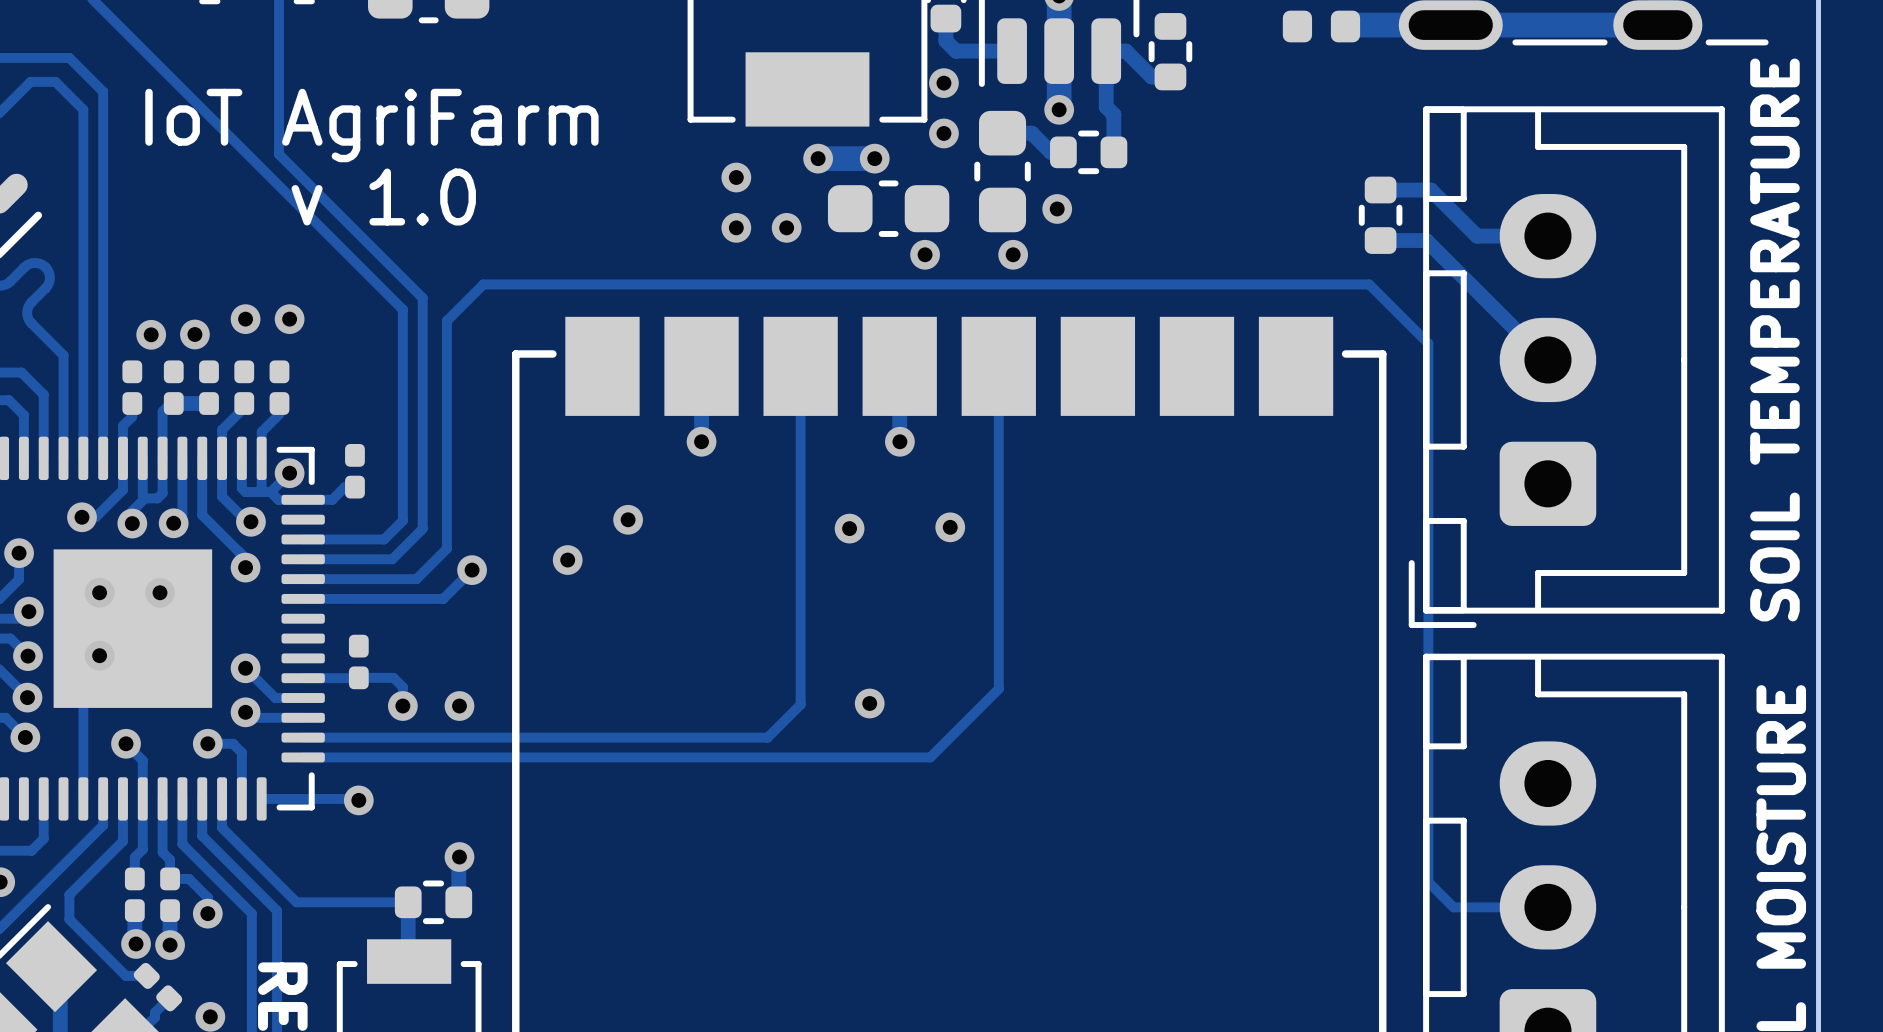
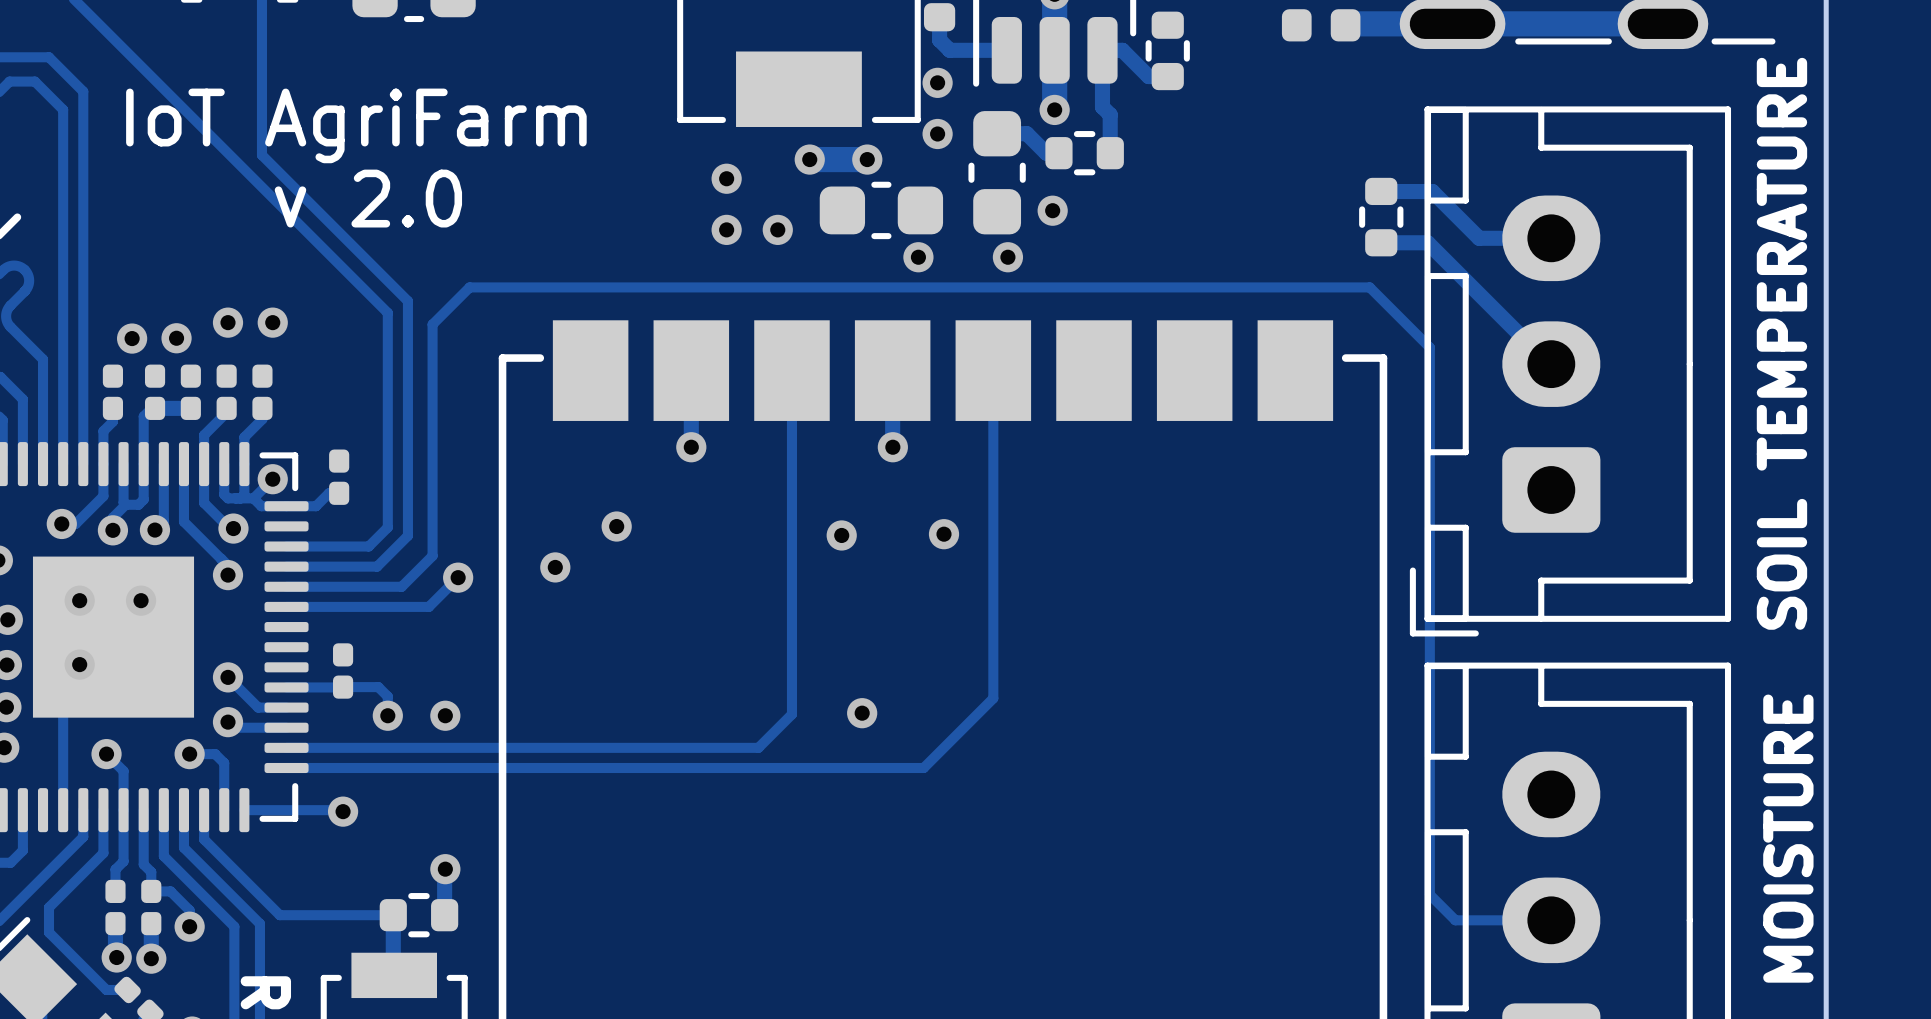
text: v 1.0 (383, 197) -> v 2.0 (368, 198)

